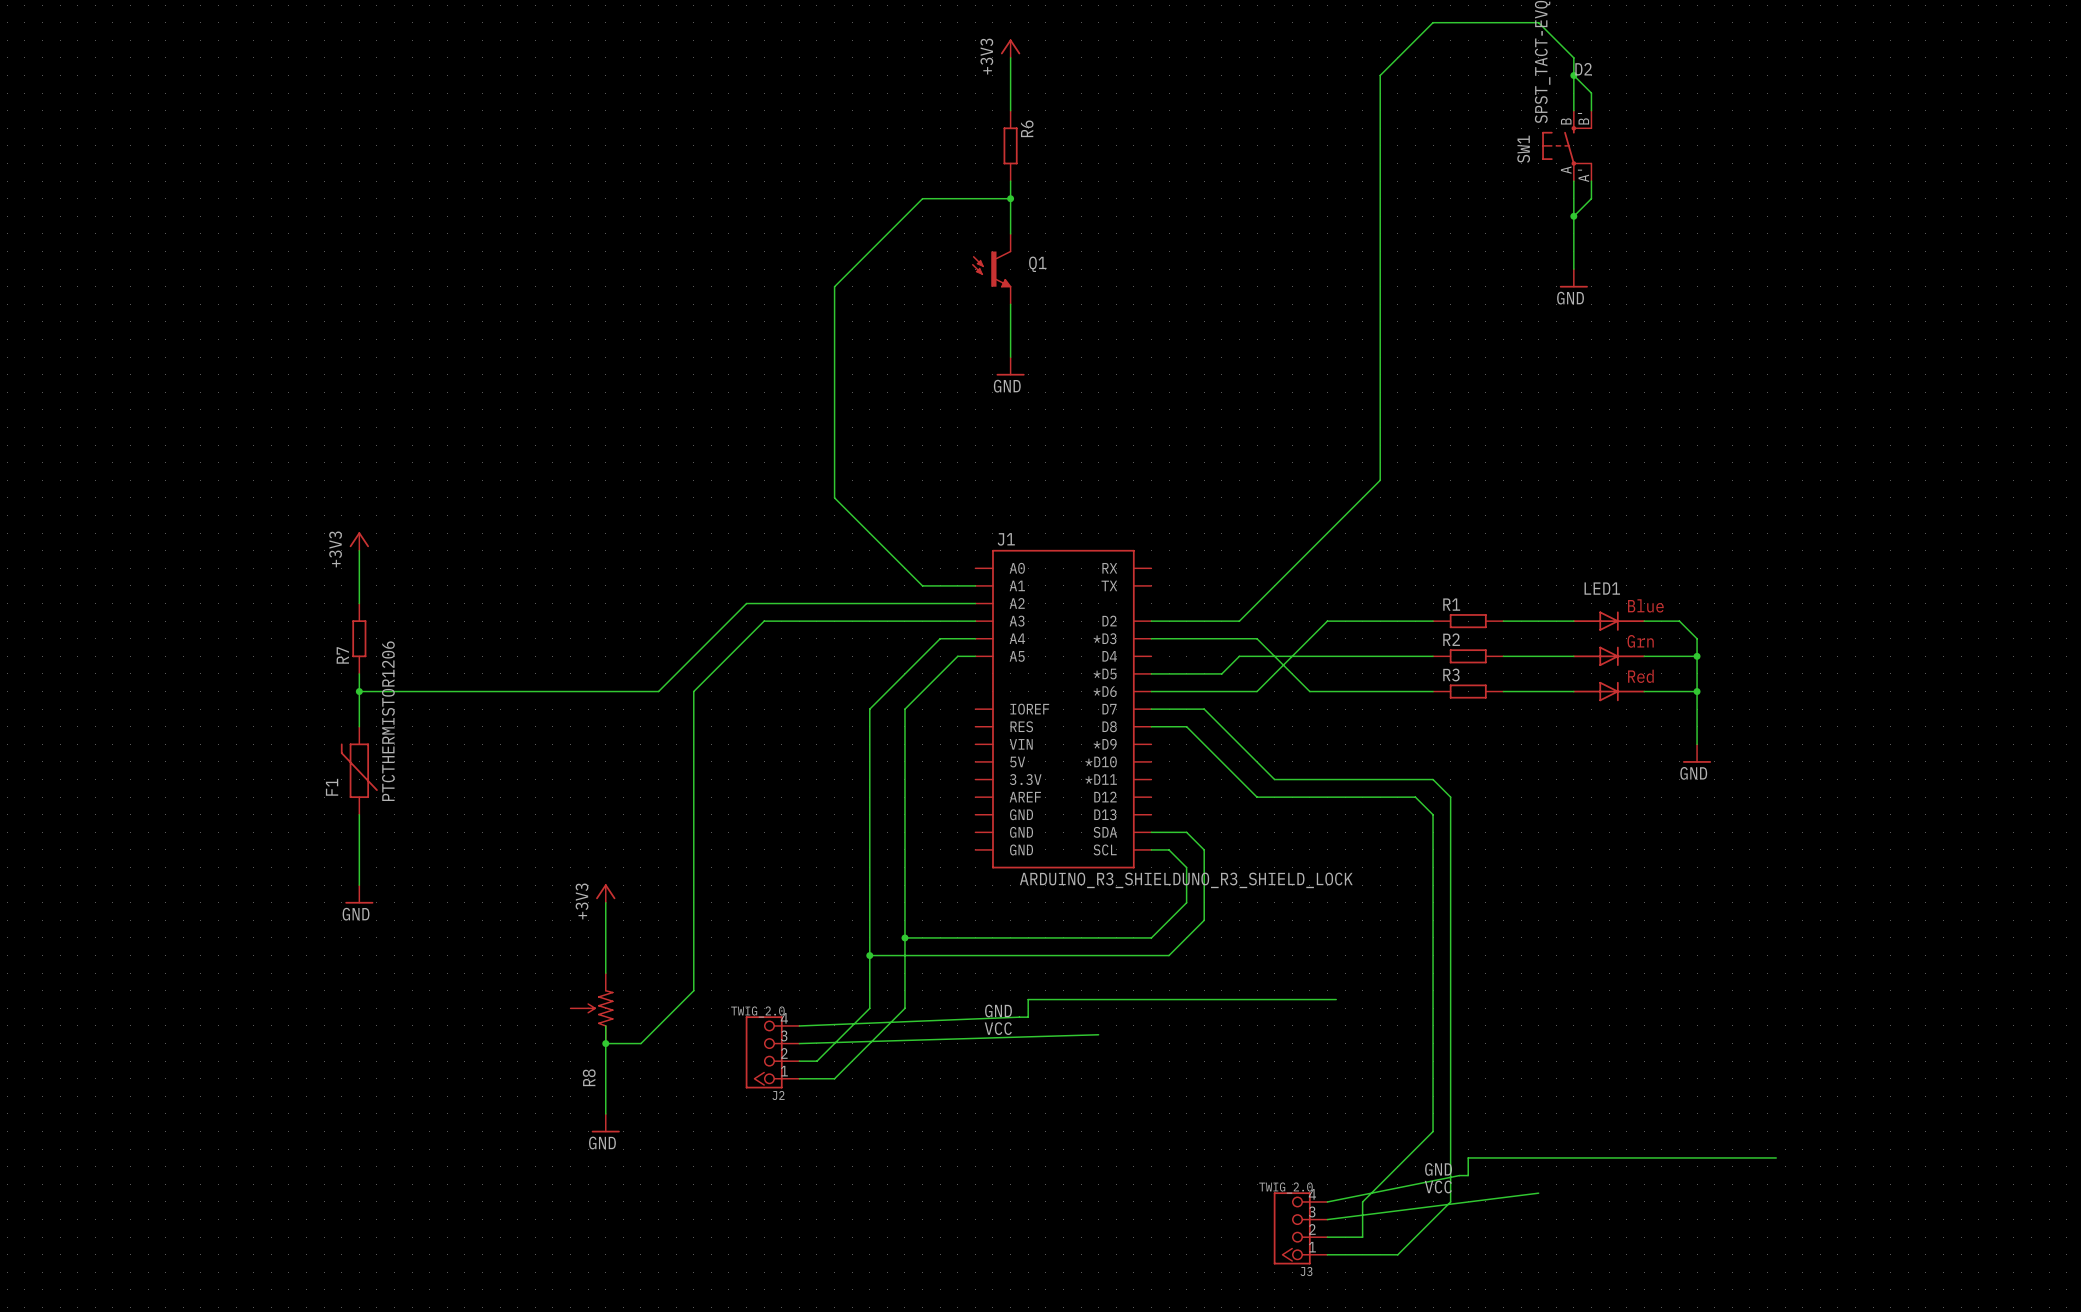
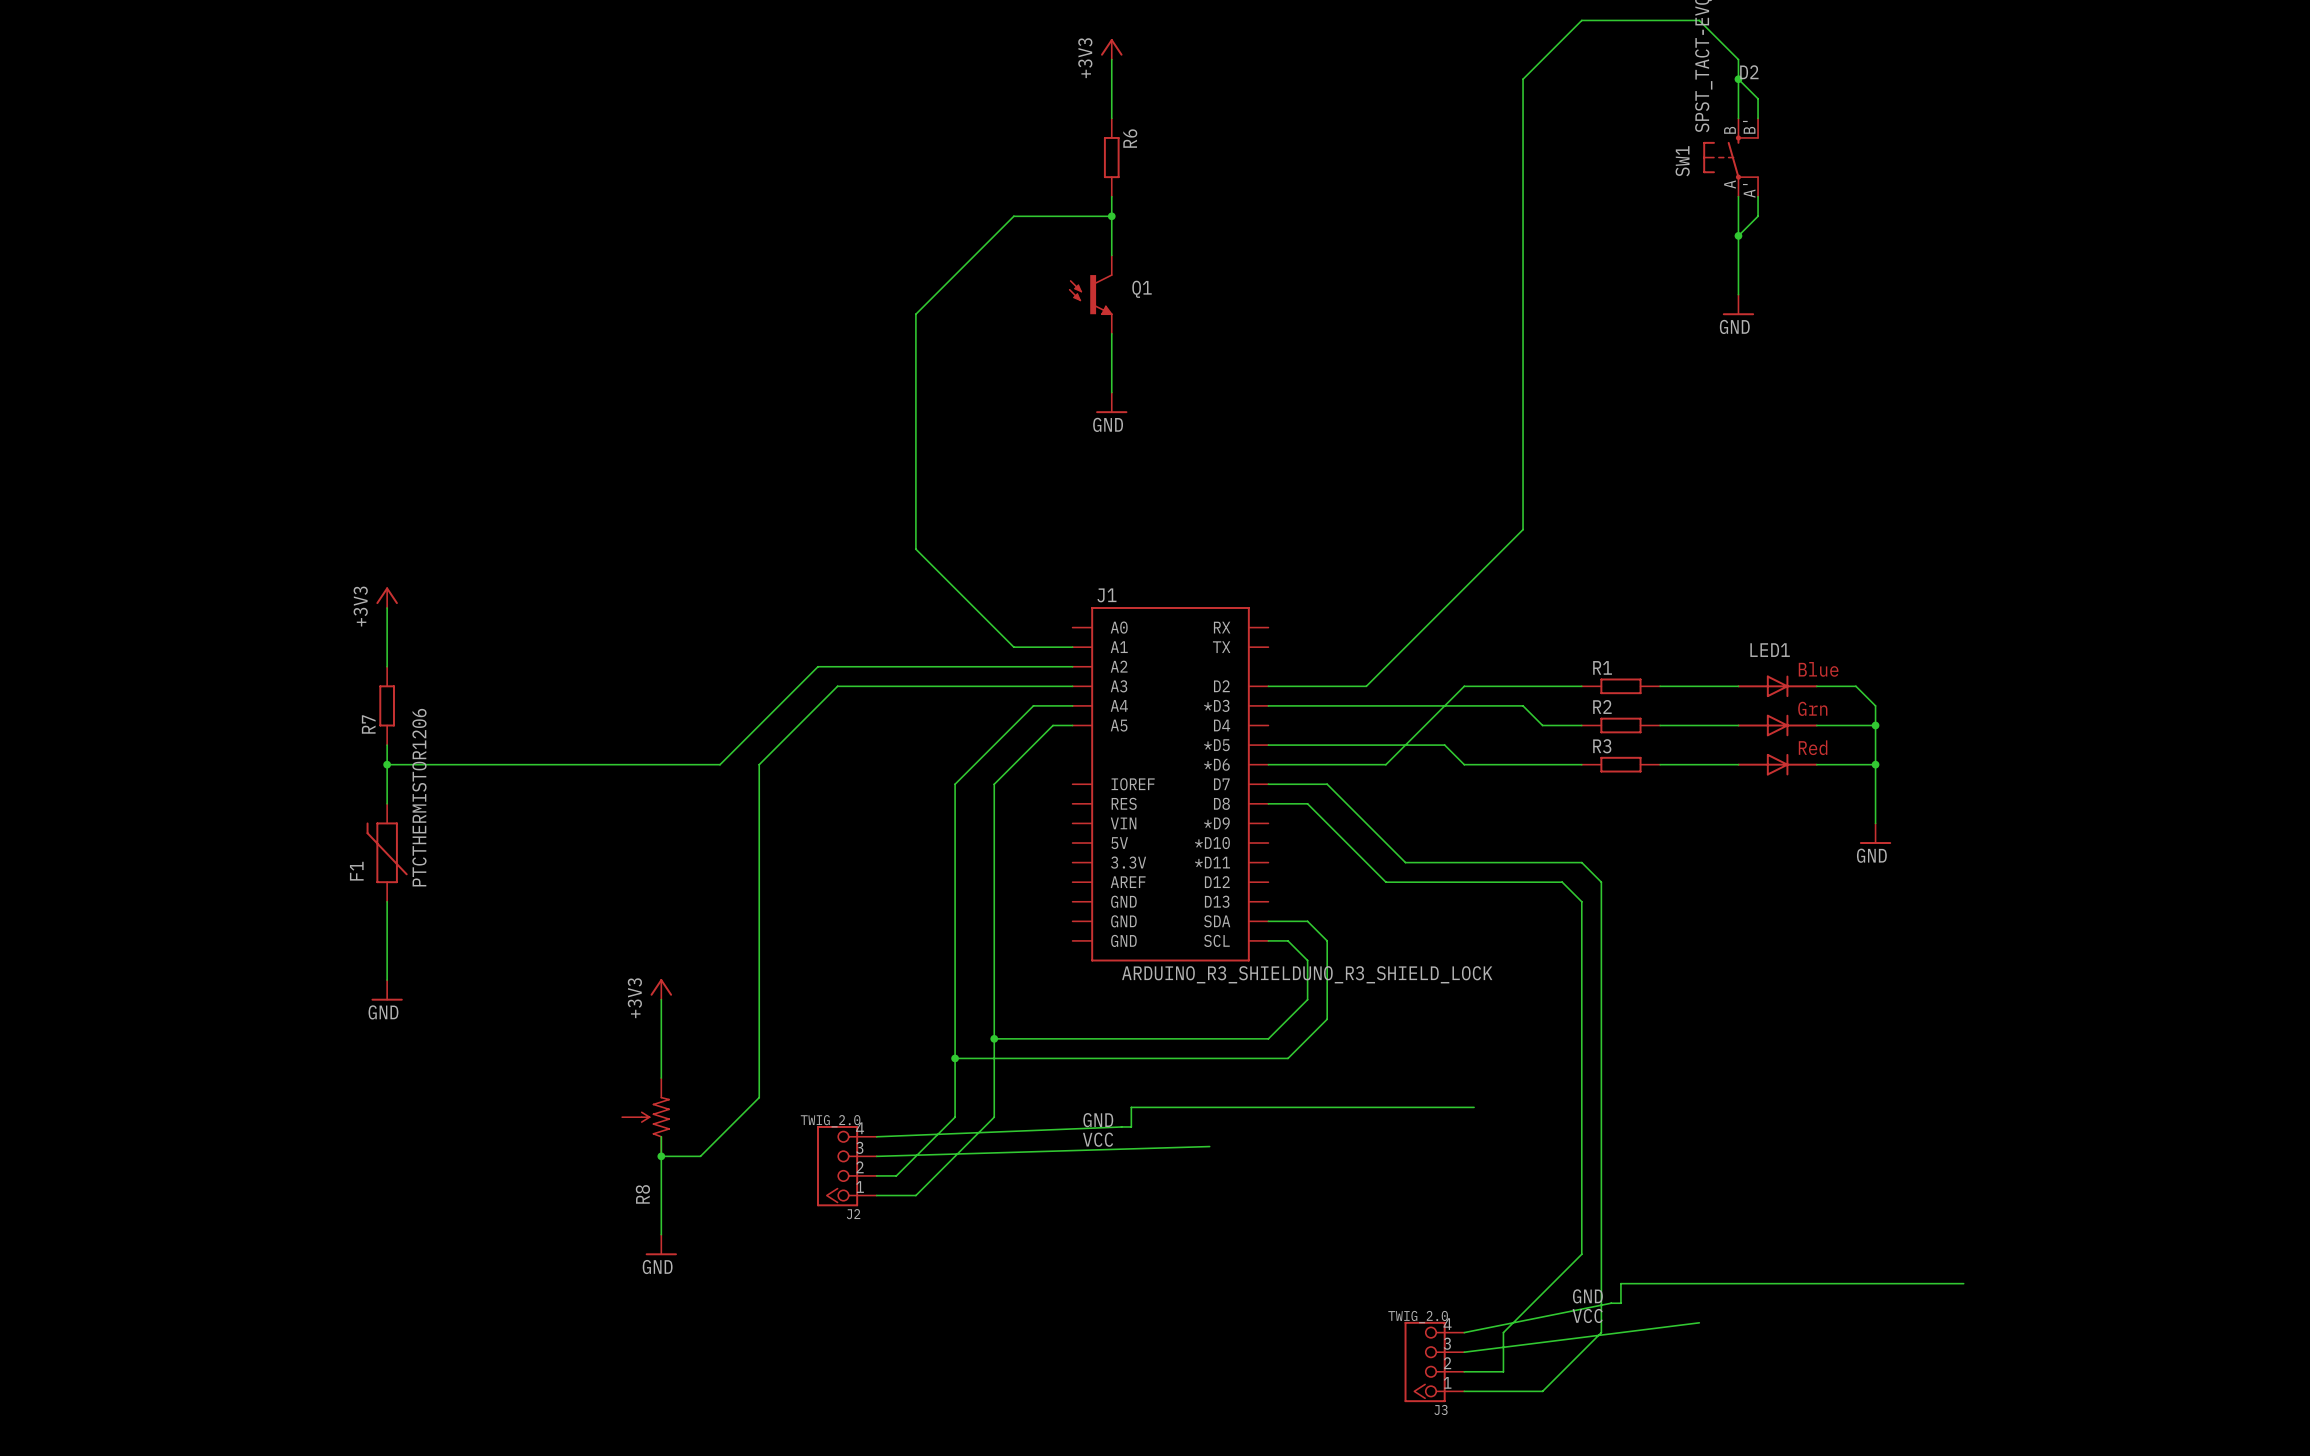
wire: (1257, 638) (1309, 691) (1327, 691) -> (1346, 745) (1444, 745) (1464, 764)
wire: (1397, 656) (1239, 656) (1221, 673) -> (1542, 725) (1523, 705) (1385, 705)

